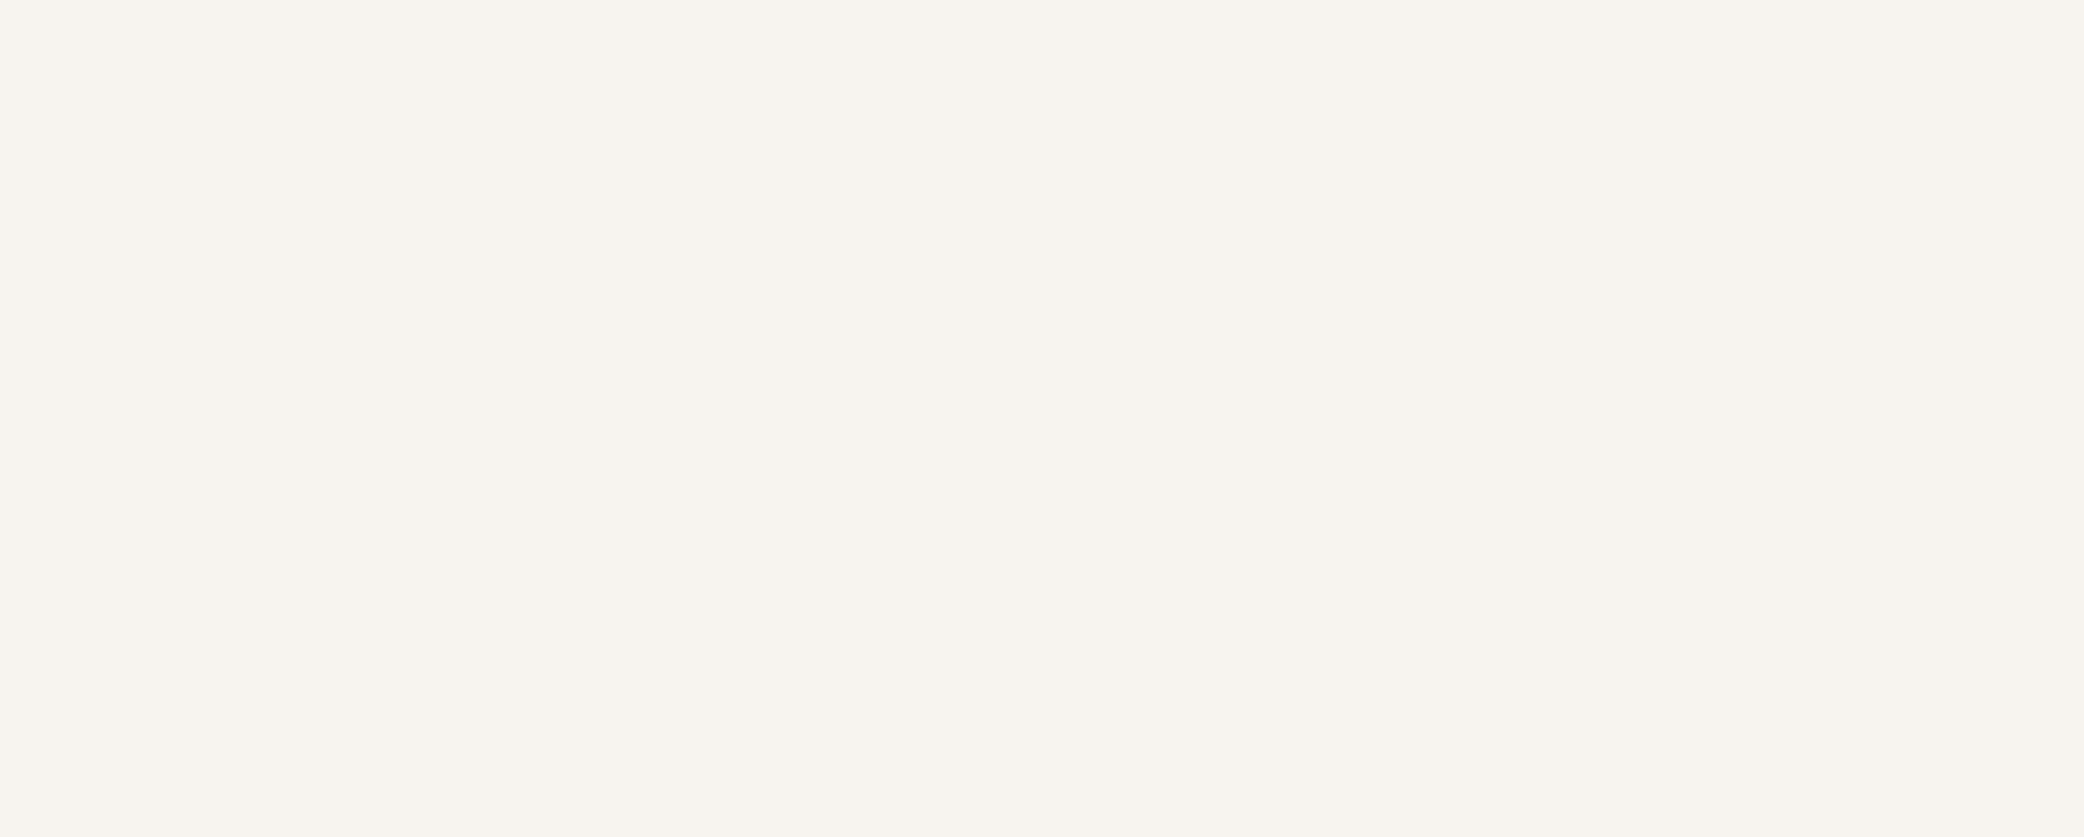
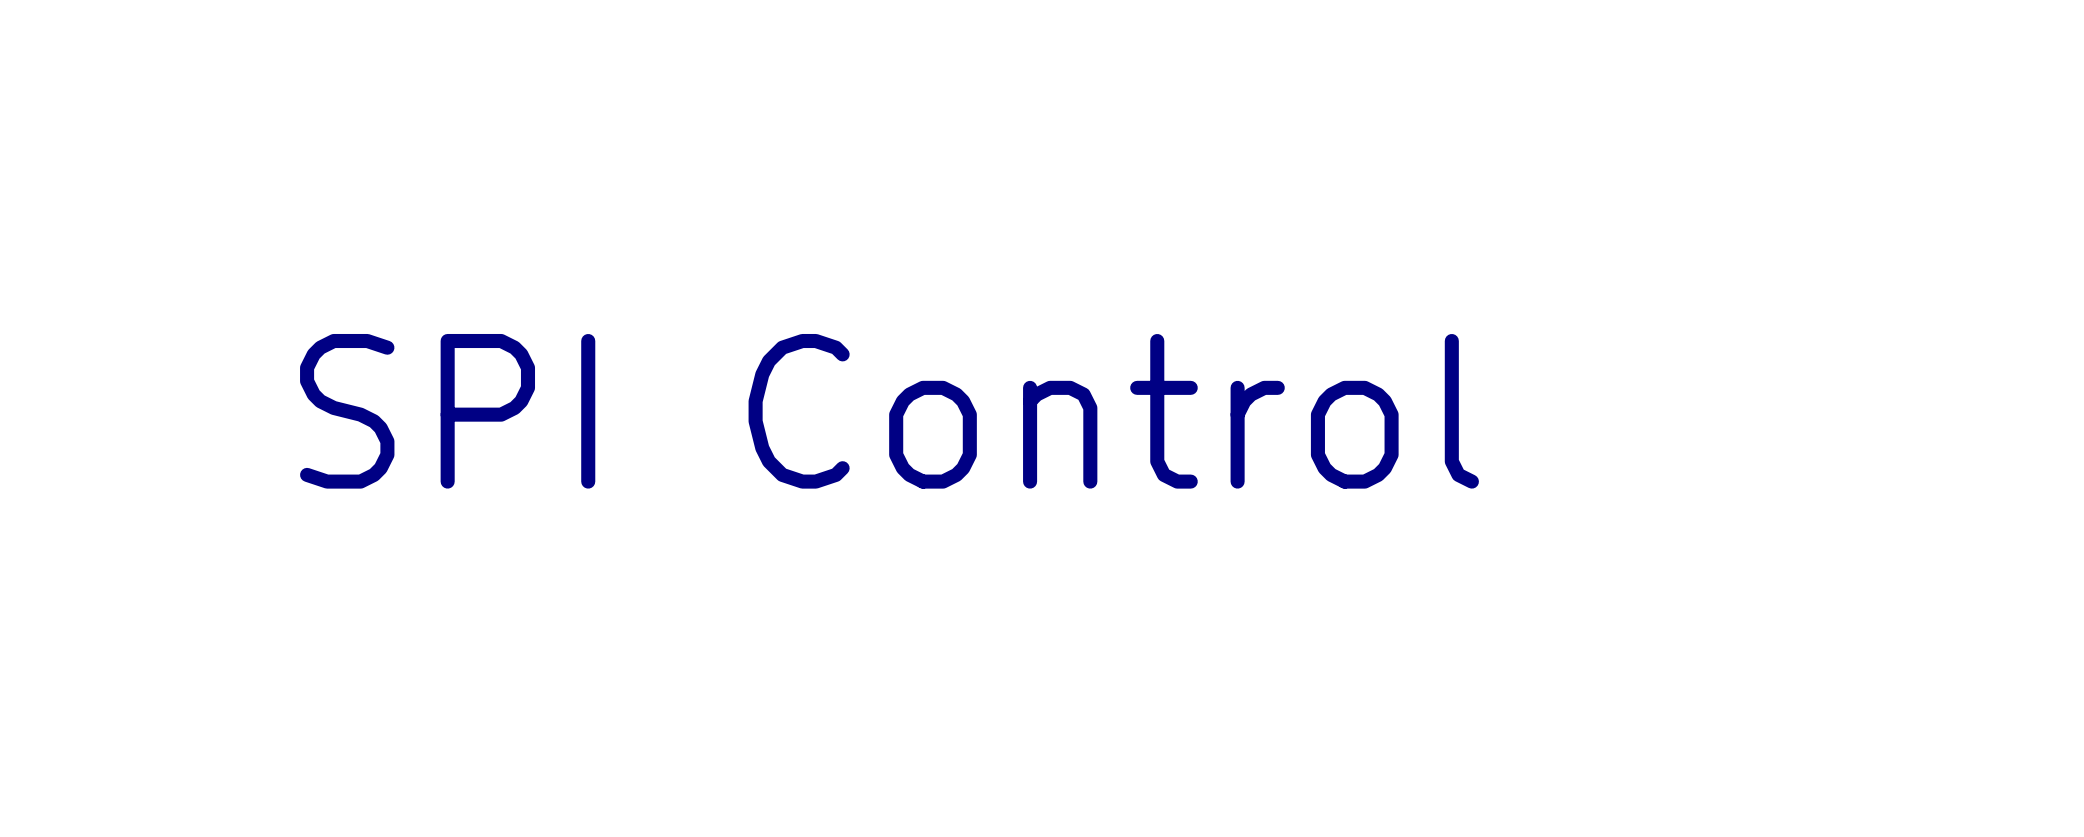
text: none -> SPI Control (889, 411)

